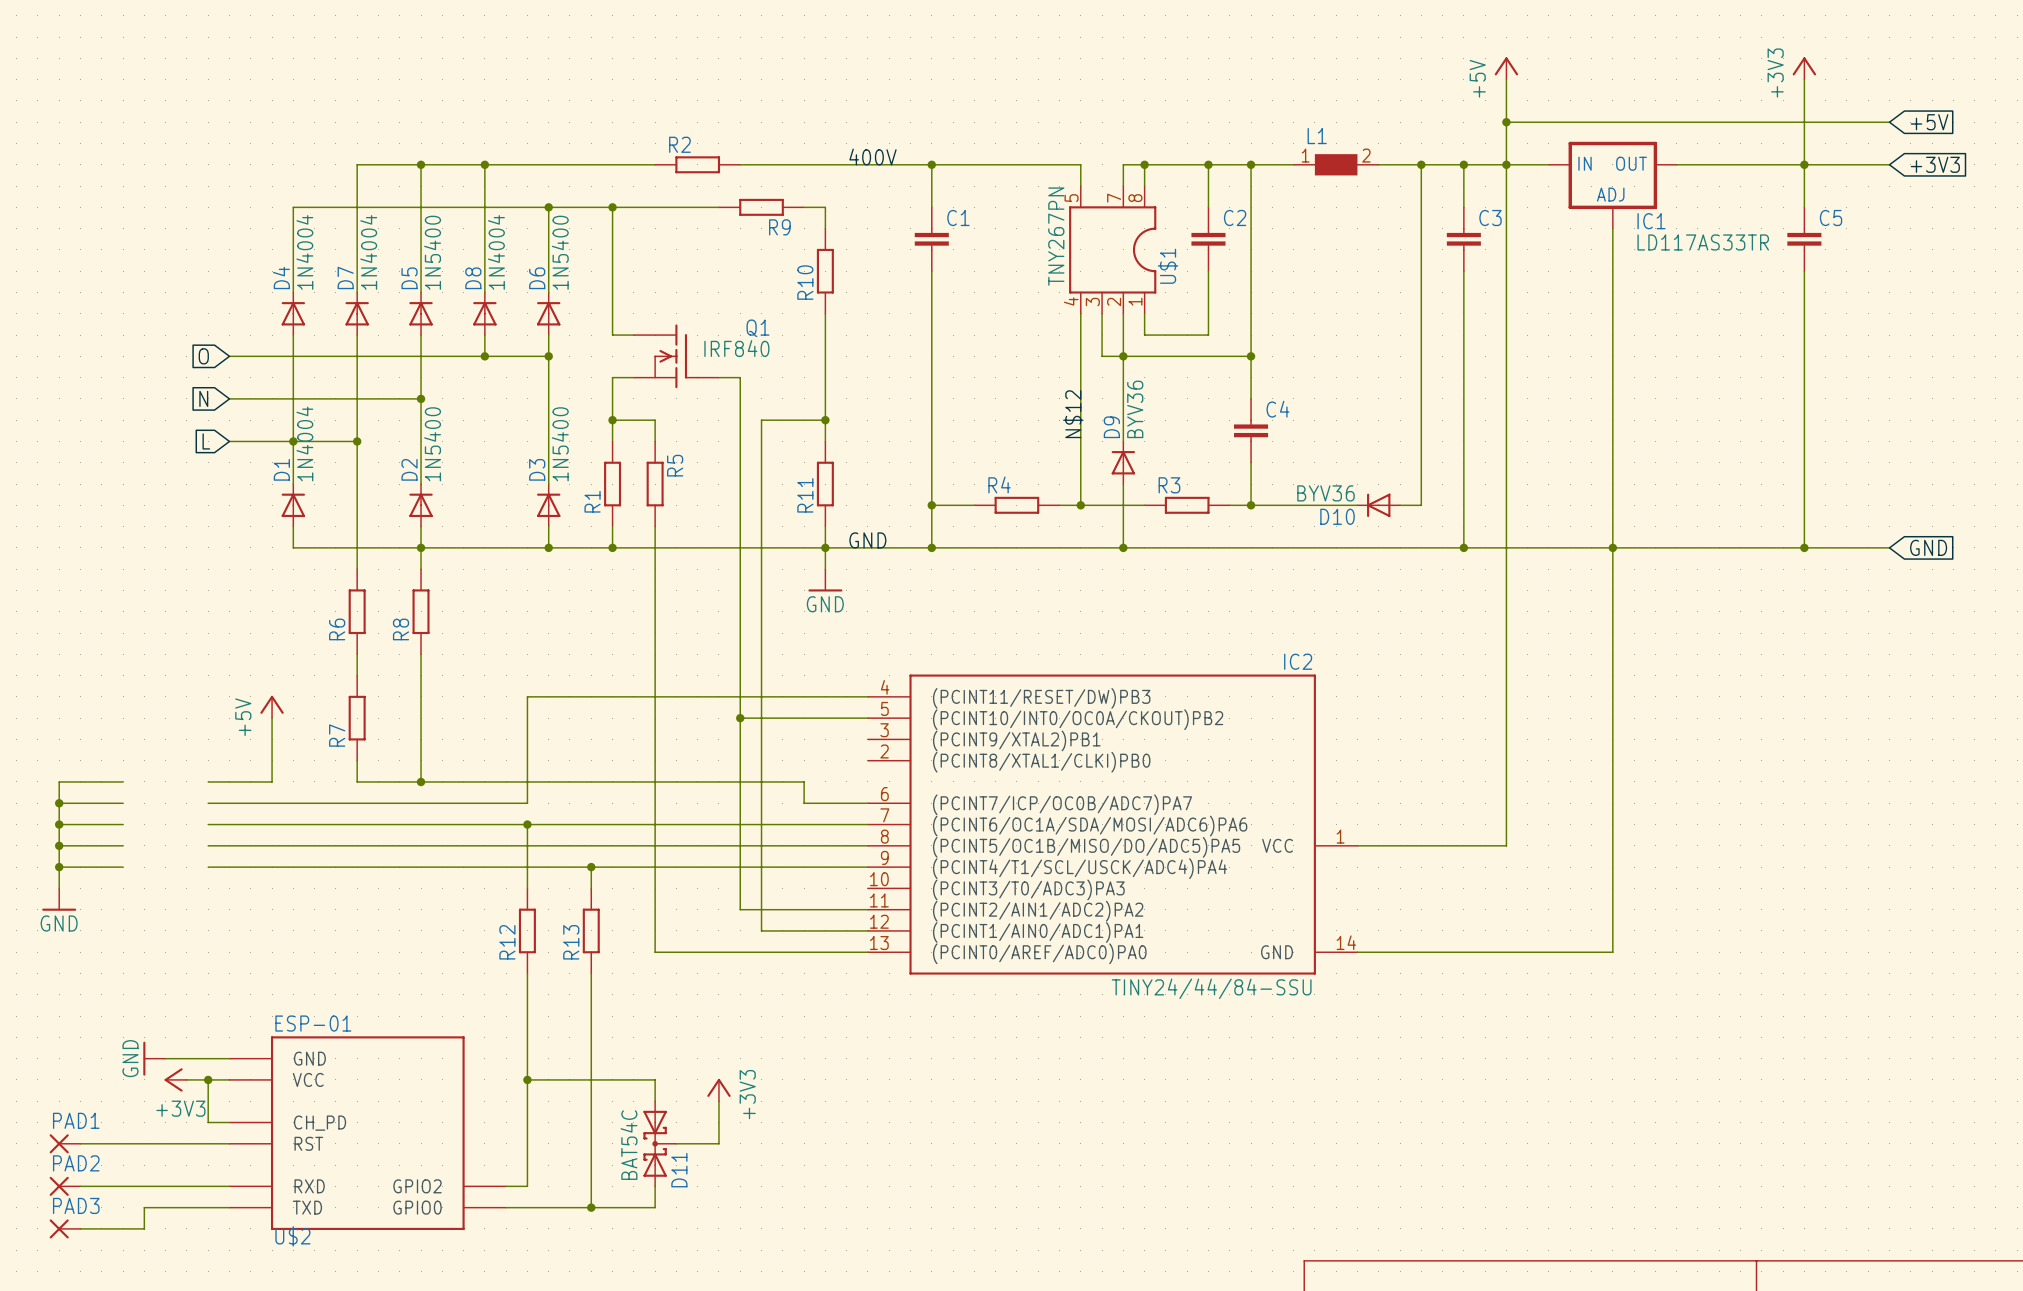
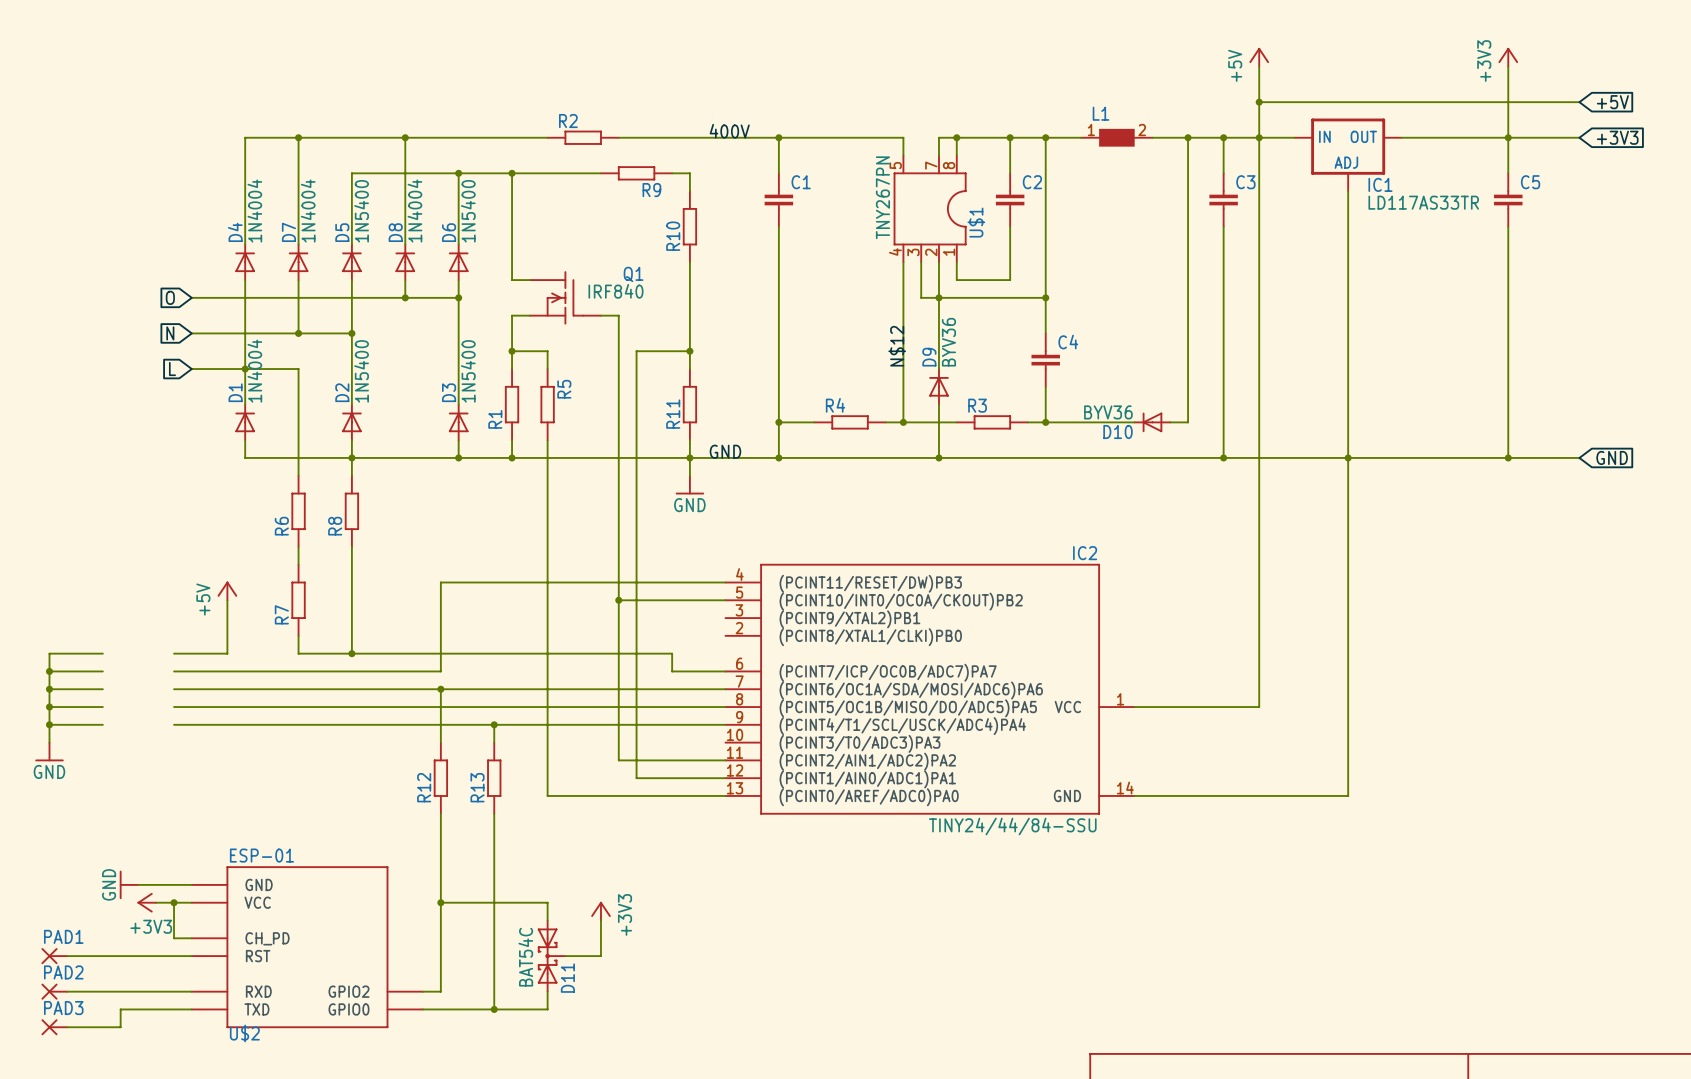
junction: none -> (298, 137)
wire: (421, 164) (421, 207) (293, 207) -> (298, 137) (245, 137) (245, 173)
junction: (421, 164) -> none
wire: (357, 398) (357, 441) -> none
junction position: (357, 441) -> (298, 333)

